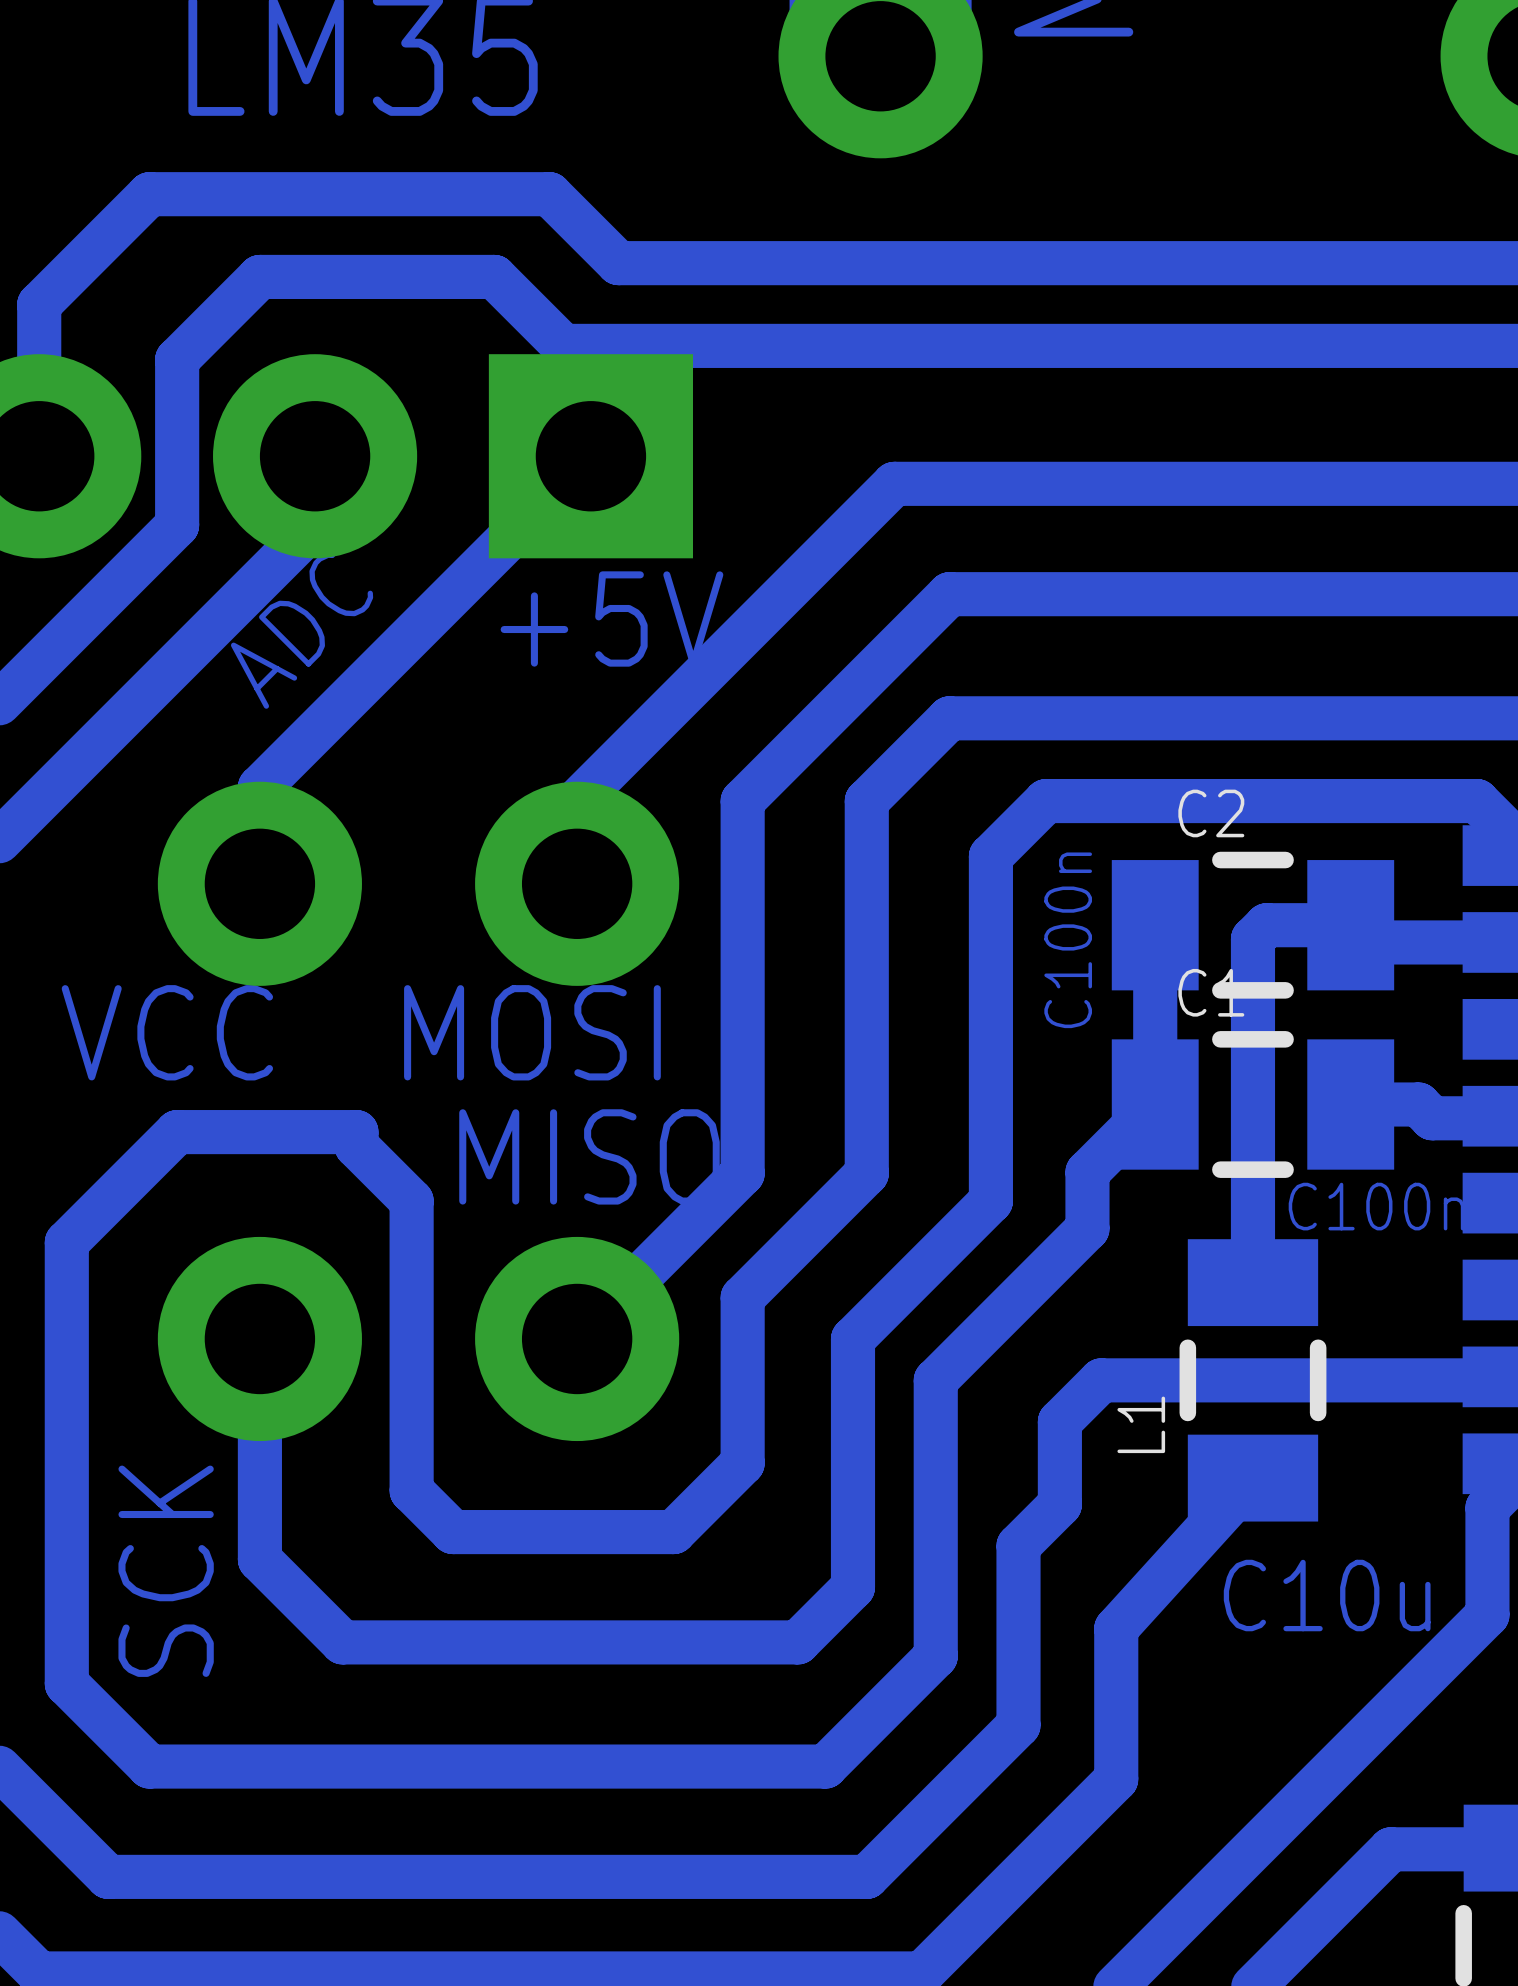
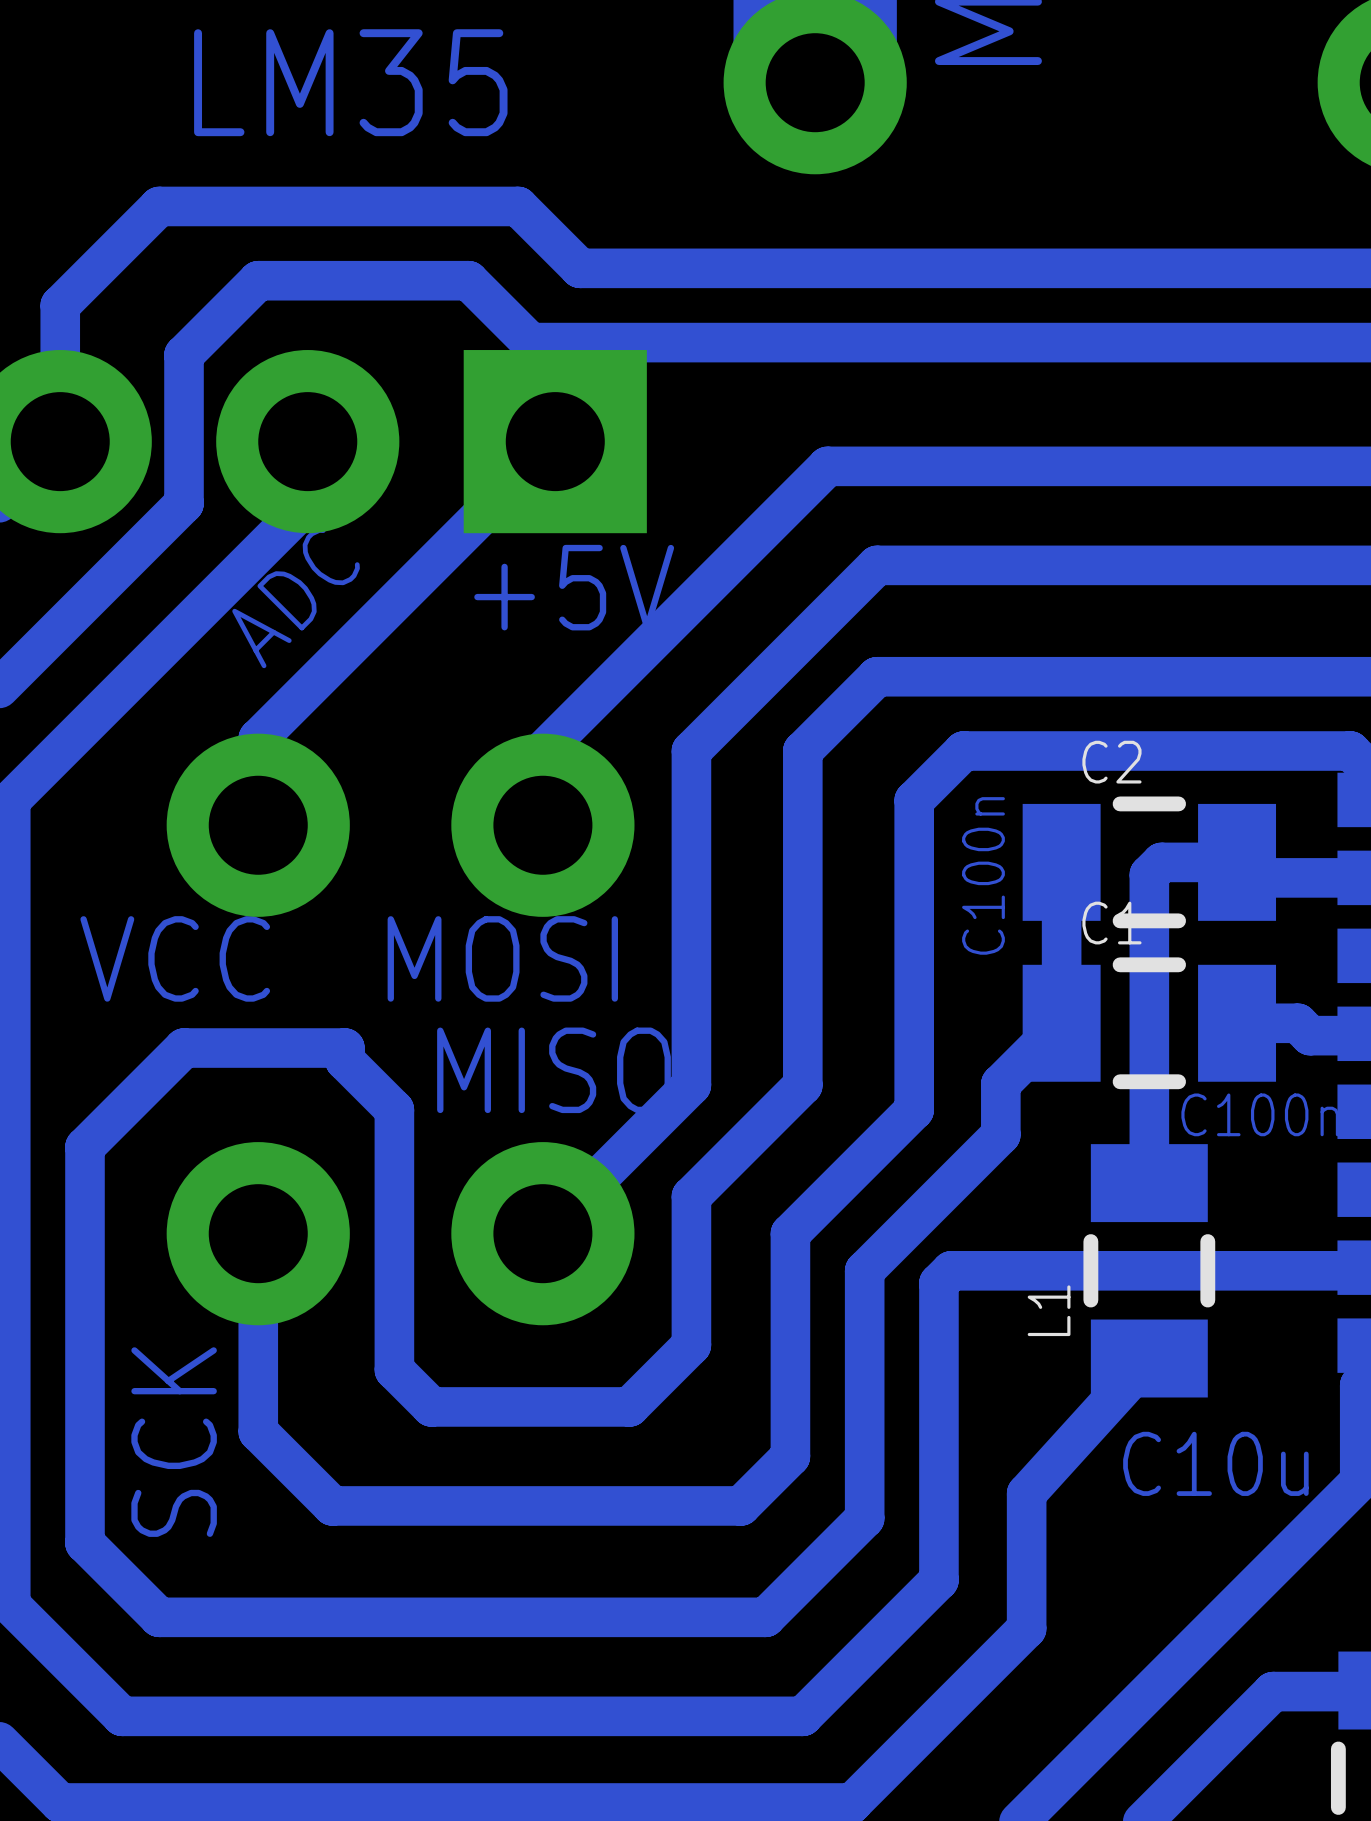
track: (1101, 1380) (1059, 1421) (1059, 1504) (1018, 1545) -> (1013, 1270) (951, 1270) (938, 1283) (938, 1419)

